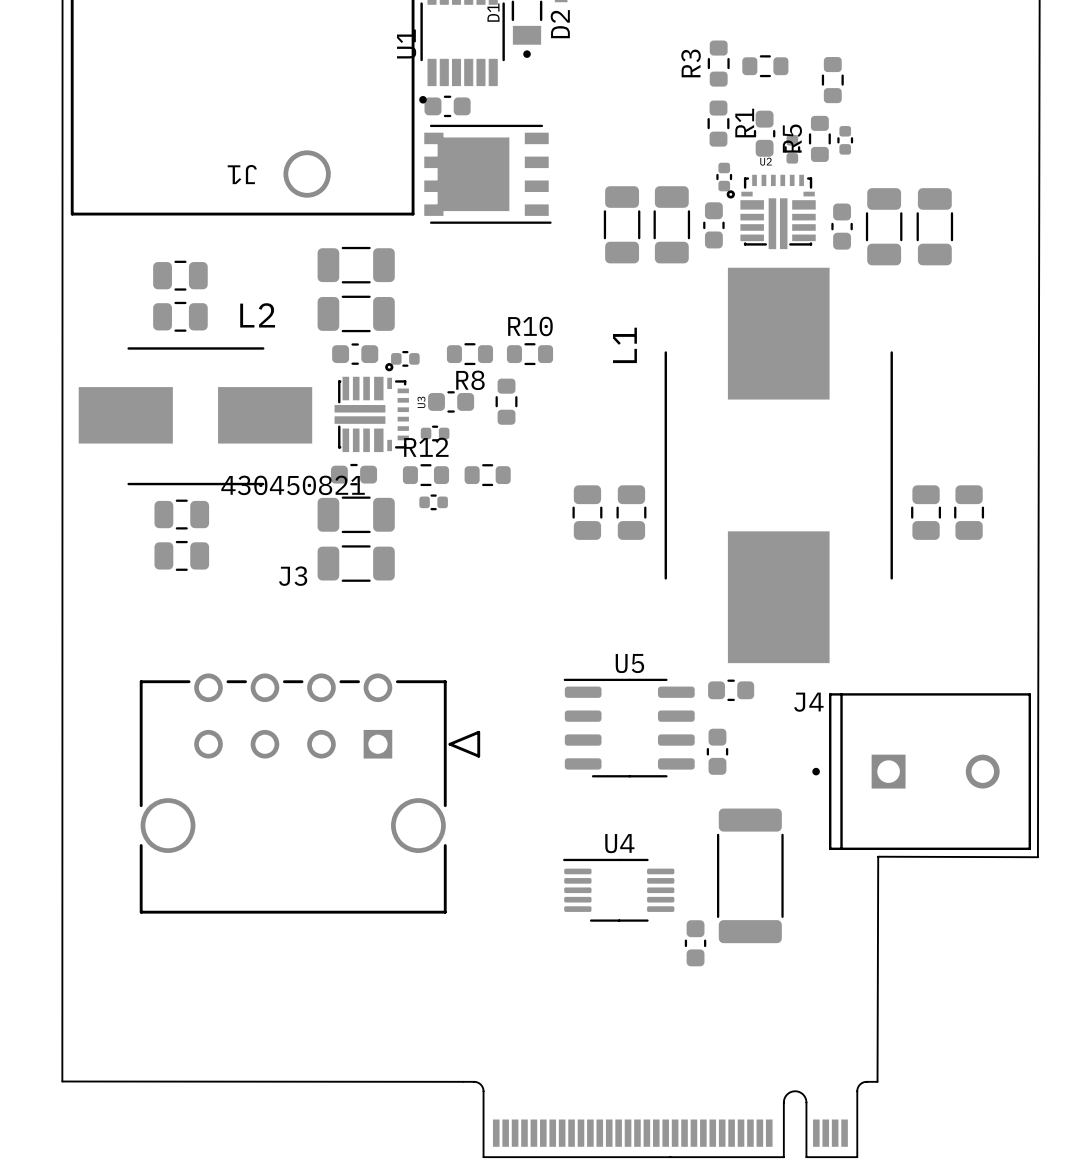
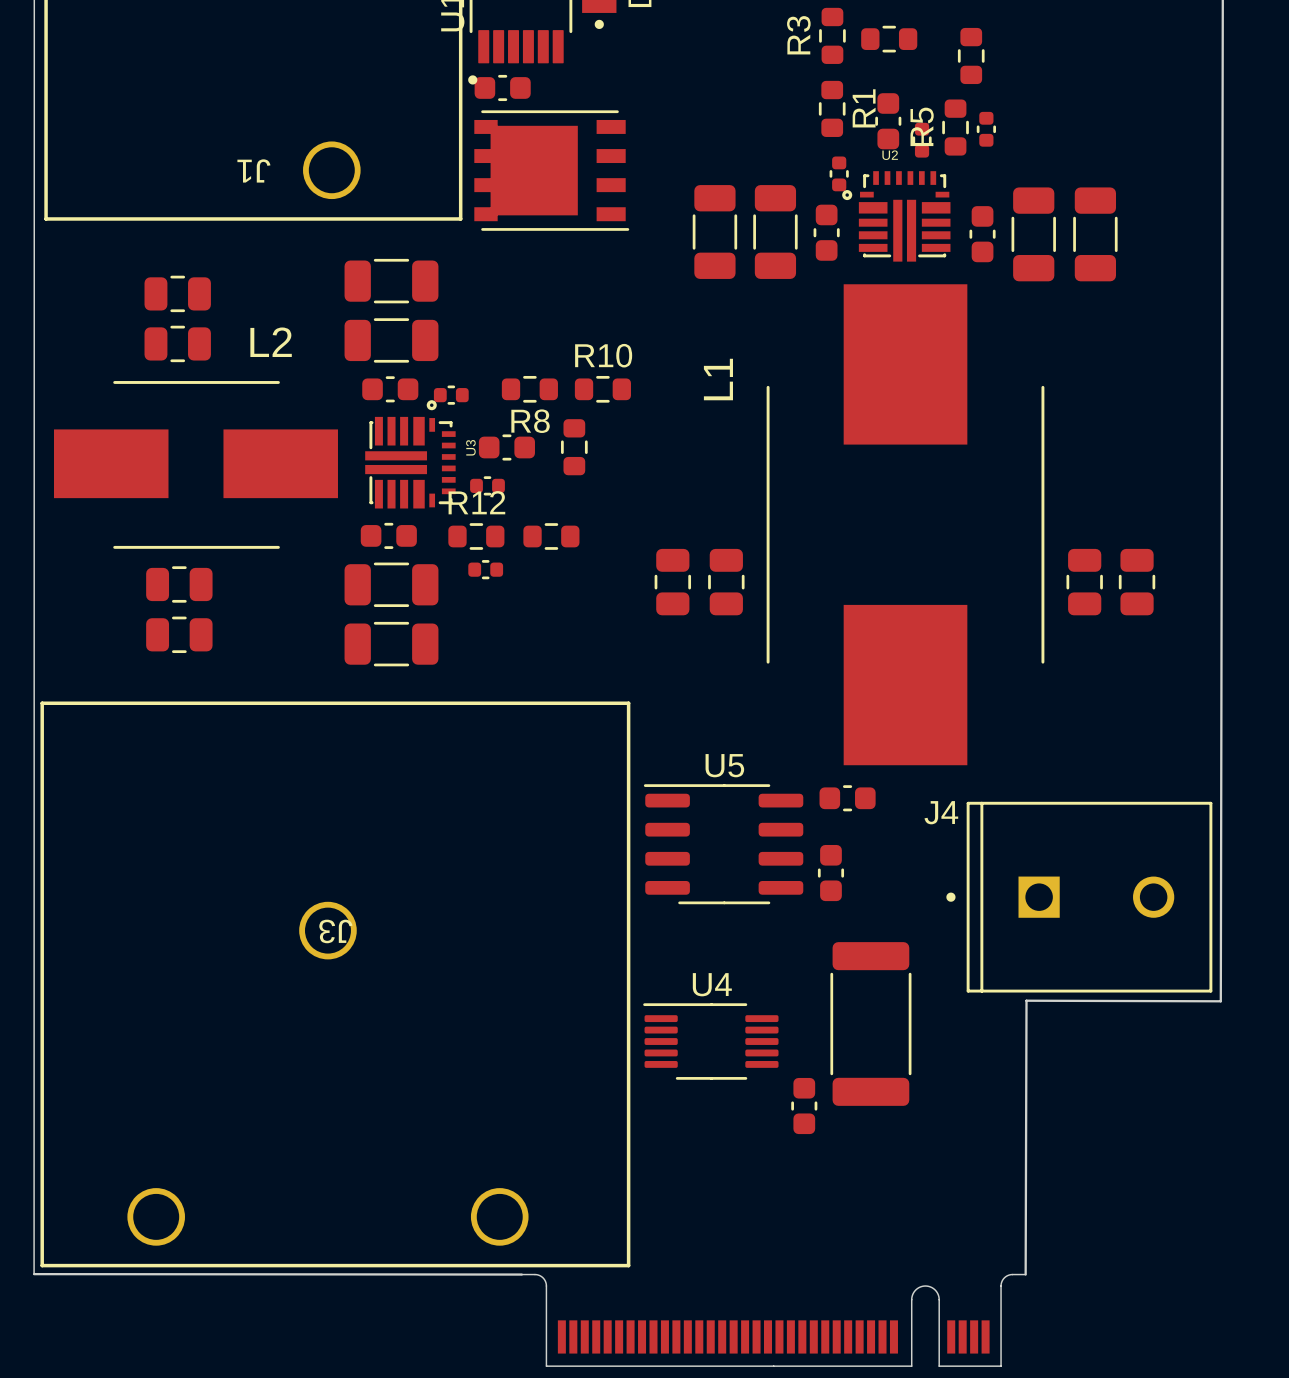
J3 name position: J3 (293, 576) -> J3 (335, 931)
J3 footprint: [139, 673, 481, 914] -> [40, 701, 631, 1268]

